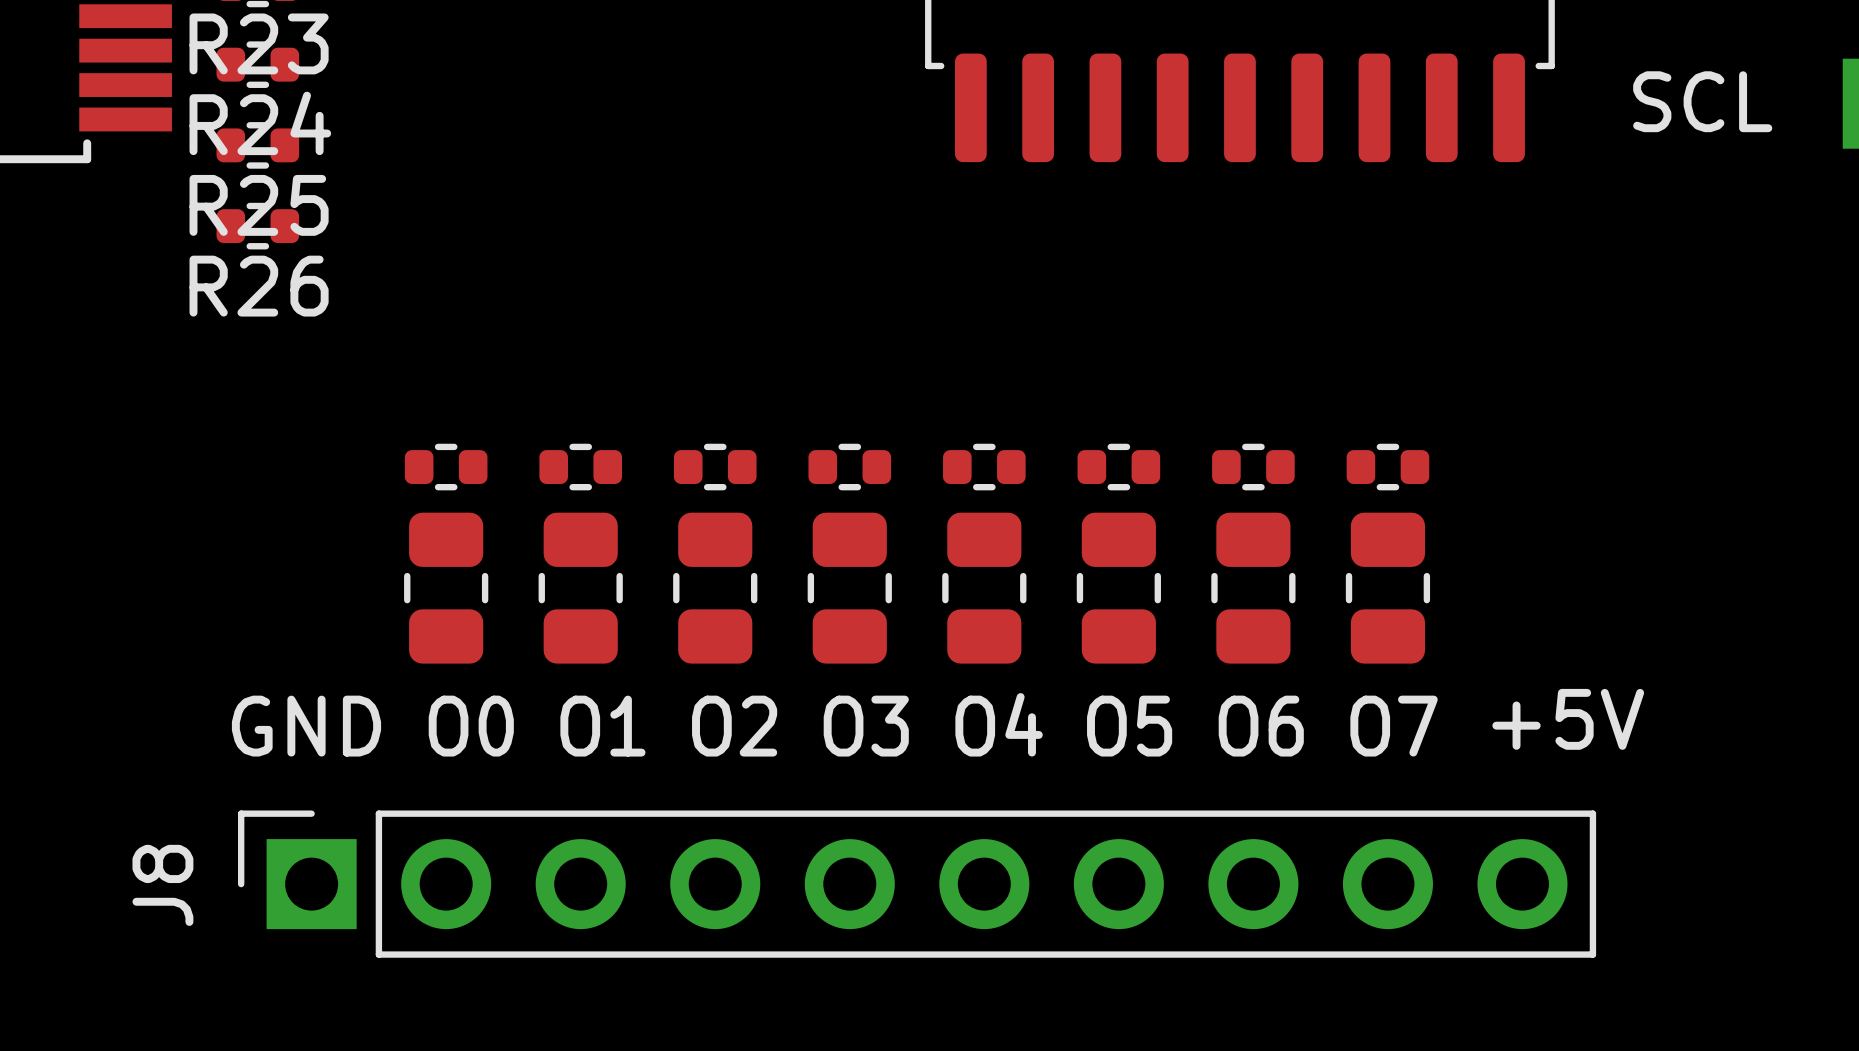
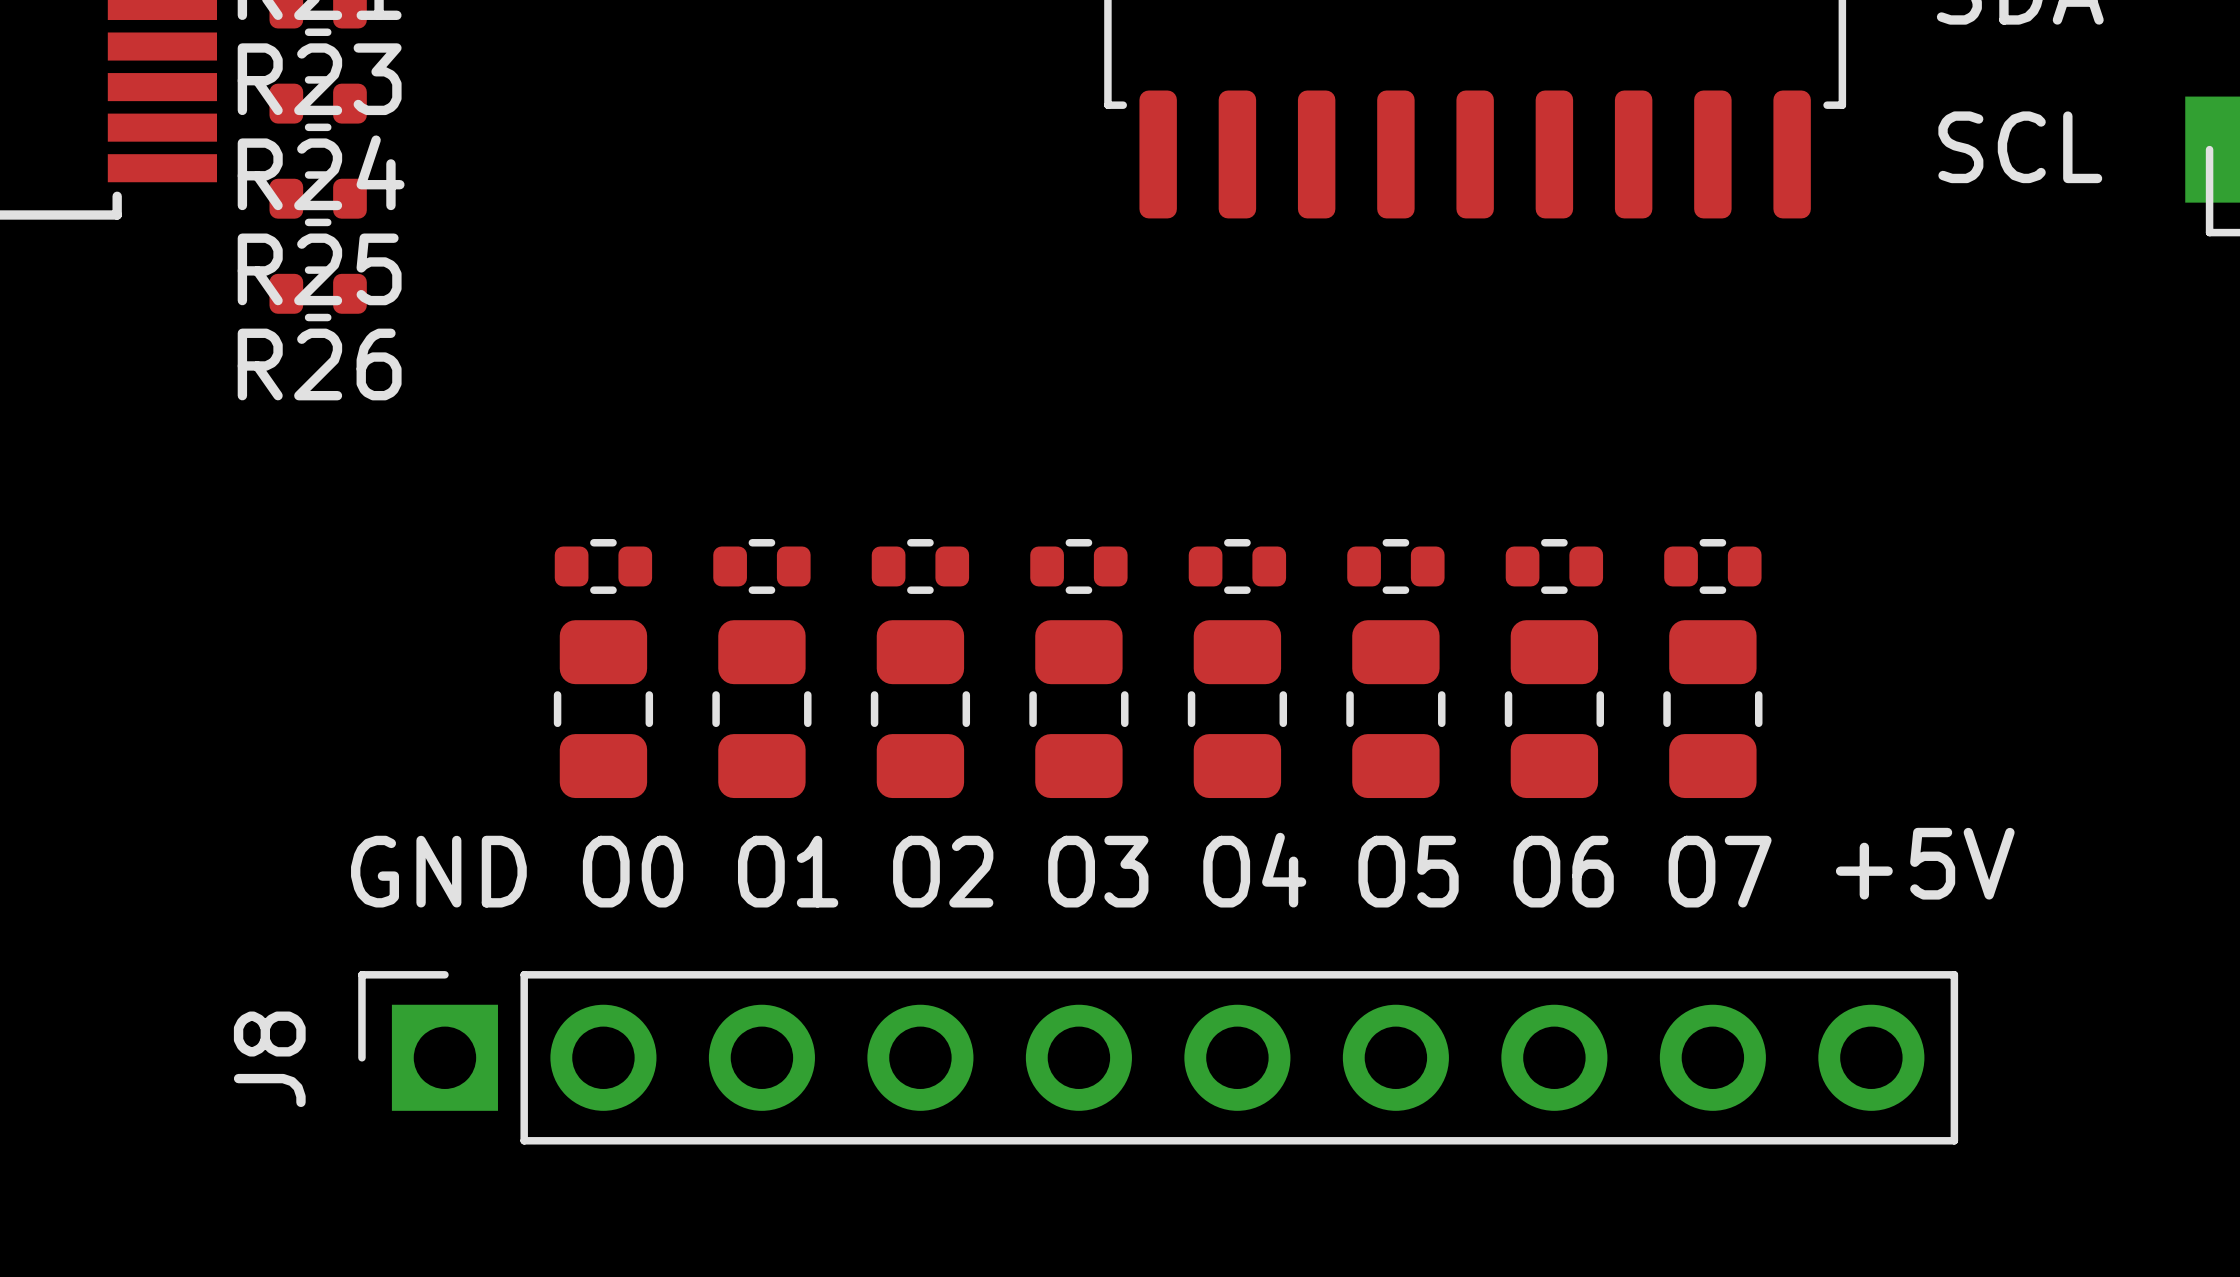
part: none -> (603, 566)
part: none -> (761, 566)
part: none -> (920, 566)
part: none -> (1078, 566)
part: none -> (1237, 566)
part: none -> (1395, 566)
part: none -> (1554, 566)
part: none -> (1712, 566)
part: (446, 467) -> none
part: (580, 467) -> none
part: (715, 467) -> none
part: (849, 467) -> none
part: (984, 467) -> none
part: (1118, 467) -> none
part: (1253, 467) -> none
part: (1387, 467) -> none
part: none -> (603, 709)
part: none -> (761, 709)
part: none -> (920, 709)
part: none -> (1078, 709)
part: none -> (1237, 709)
part: none -> (1395, 709)
part: none -> (1554, 709)
part: none -> (1712, 709)
part: (446, 588) -> none
part: (580, 588) -> none
part: (715, 588) -> none
part: (849, 588) -> none
part: (984, 588) -> none
part: (1118, 588) -> none
part: (1253, 588) -> none
part: (1387, 588) -> none
text position: +5V (1568, 719) -> +5V (1925, 863)
text position: O0 O1 O2 O3 O4 O5 O6 O7 (933, 724) -> O0 O1 O2 O3 O4 O5 O6 O7 (1177, 870)
text position: GND (306, 726) -> GND (438, 871)
J8 position: (917, 884) -> (1158, 1057)

